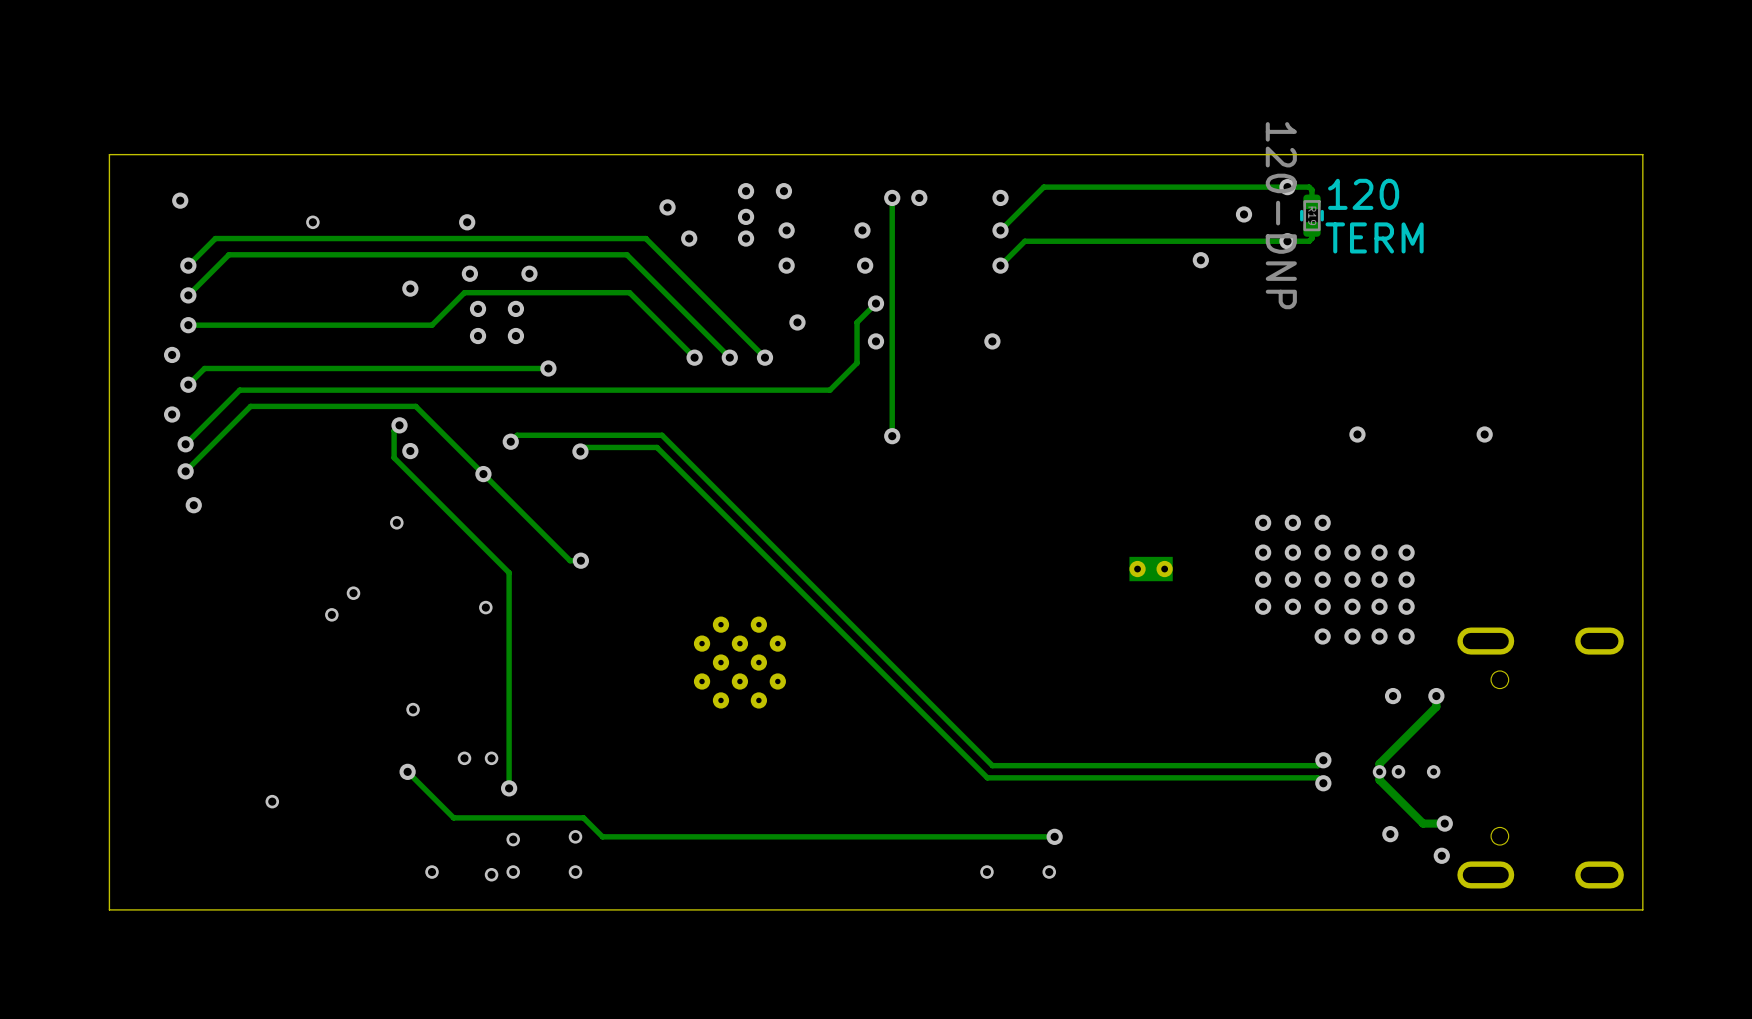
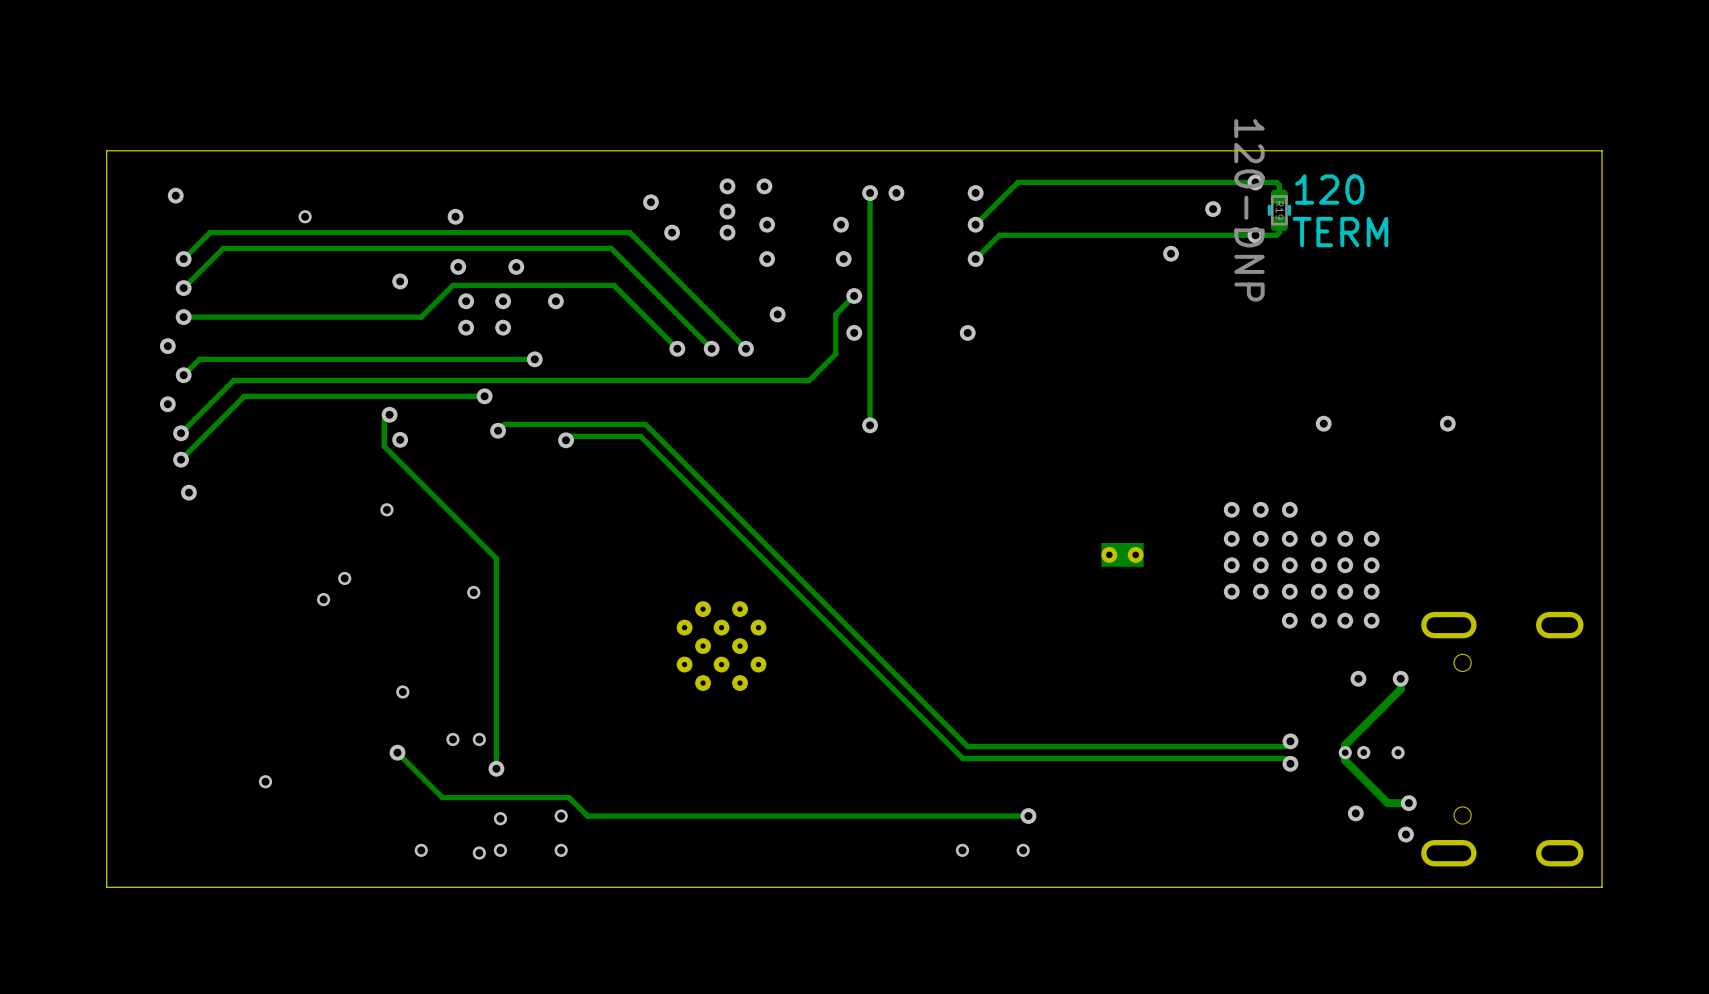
via: none -> (555, 301)
track: (415, 406) (570, 560) (580, 560) -> (405, 396) (484, 396)
via position: (483, 474) -> (484, 396)
via: (580, 560) -> none

